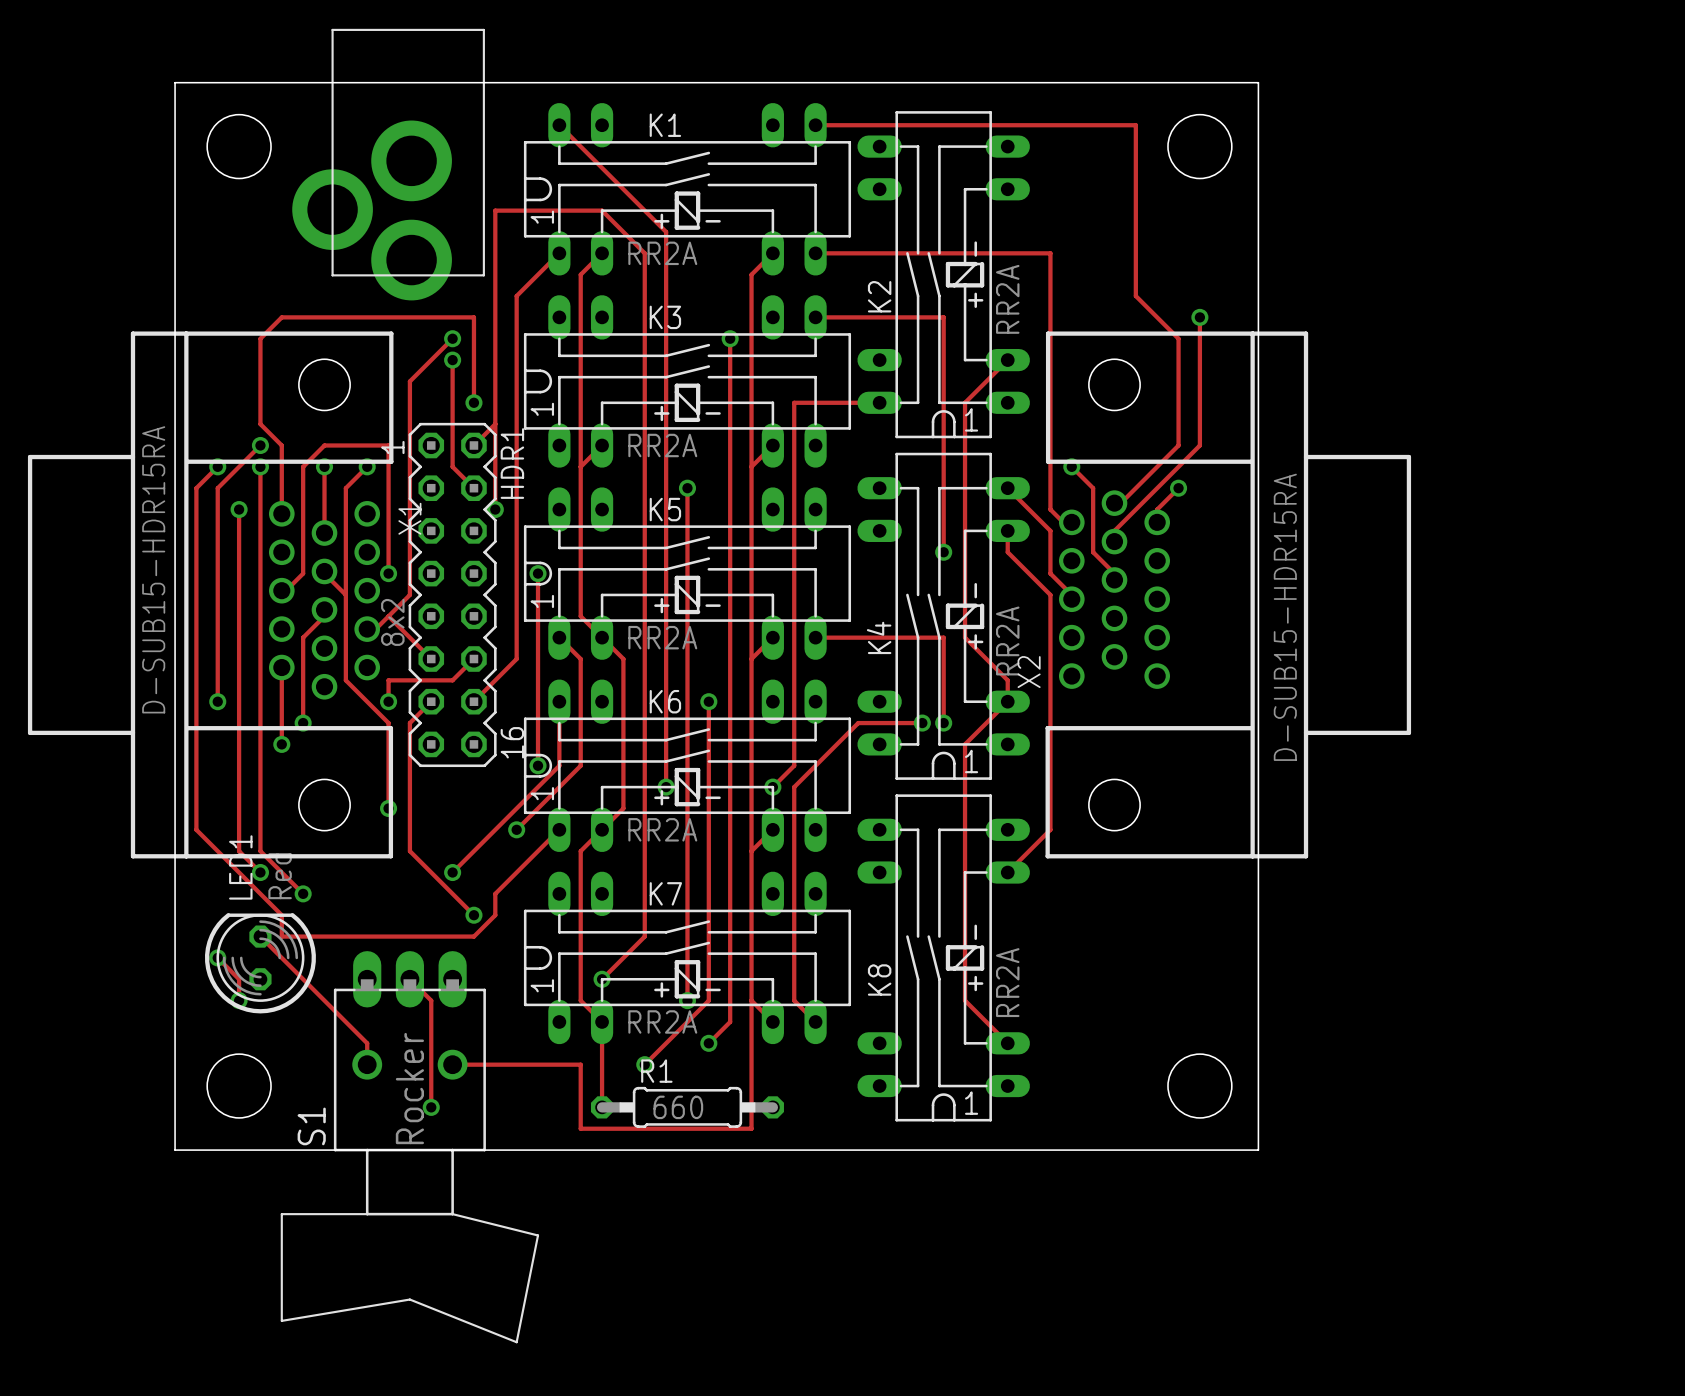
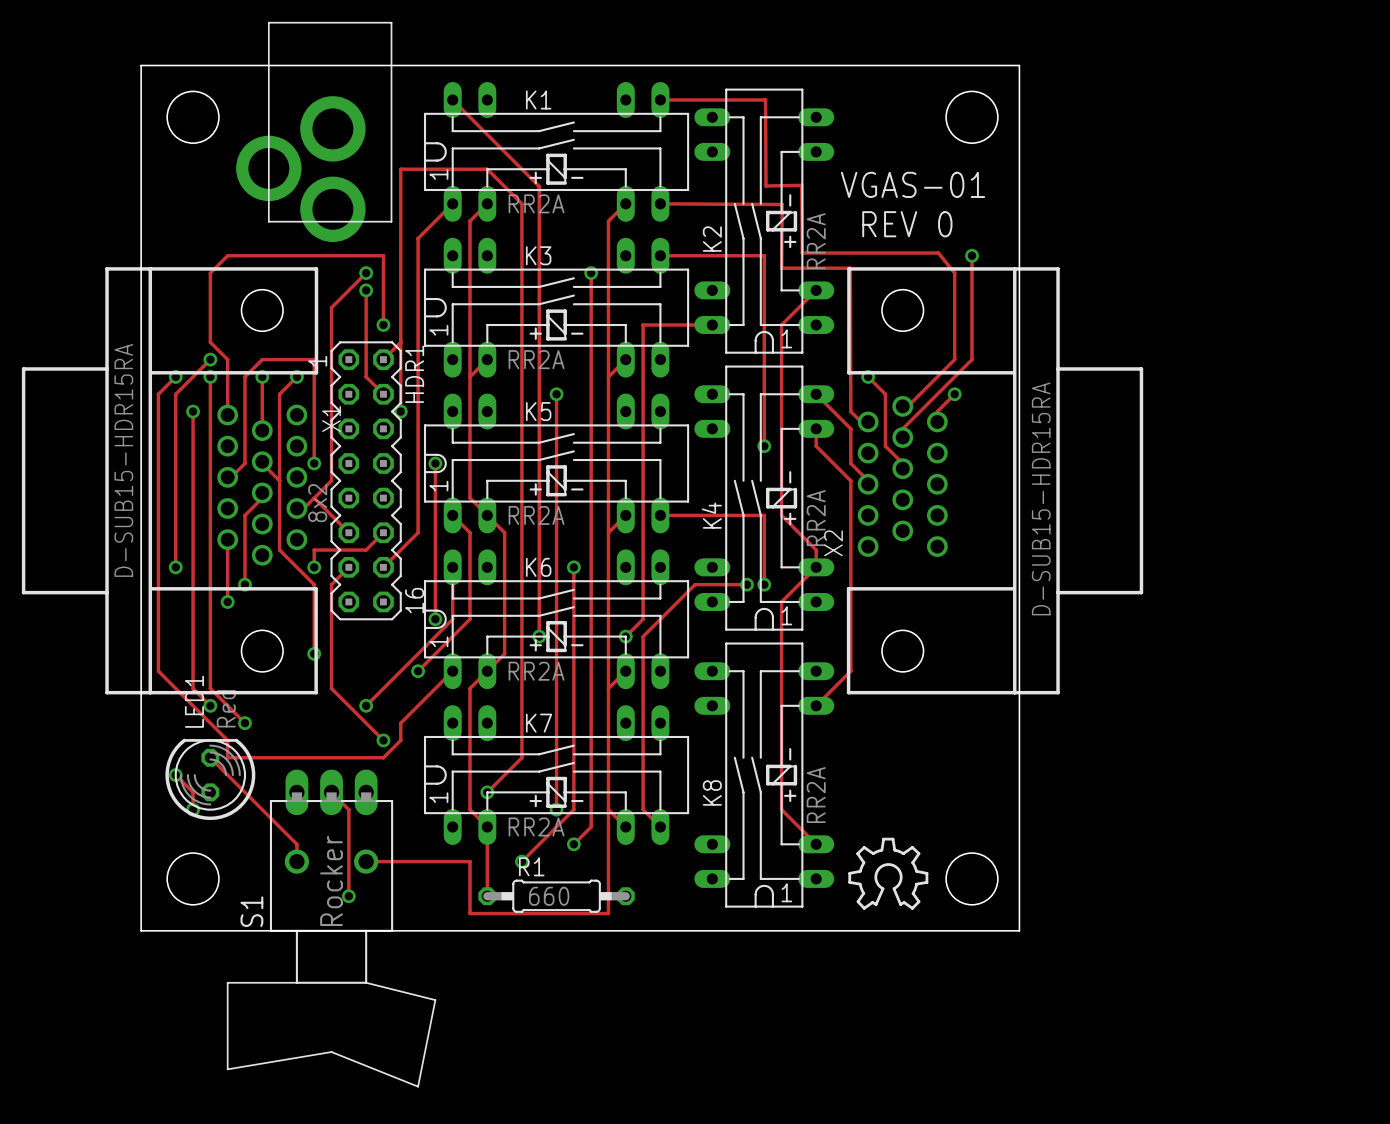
track: (945, 125) (1135, 125) (1135, 296) (1178, 338) -> (765, 99) (766, 185) (801, 185) (802, 253) (938, 253) (954, 273)
text: none -> VGAS-01 (913, 184)
track: (815, 253) (1050, 253) (1050, 509) -> (660, 203) (782, 204) (781, 268) (850, 268) (850, 411)
text: none -> REV 0 (907, 224)
drawing: none -> [848, 837, 929, 910]

